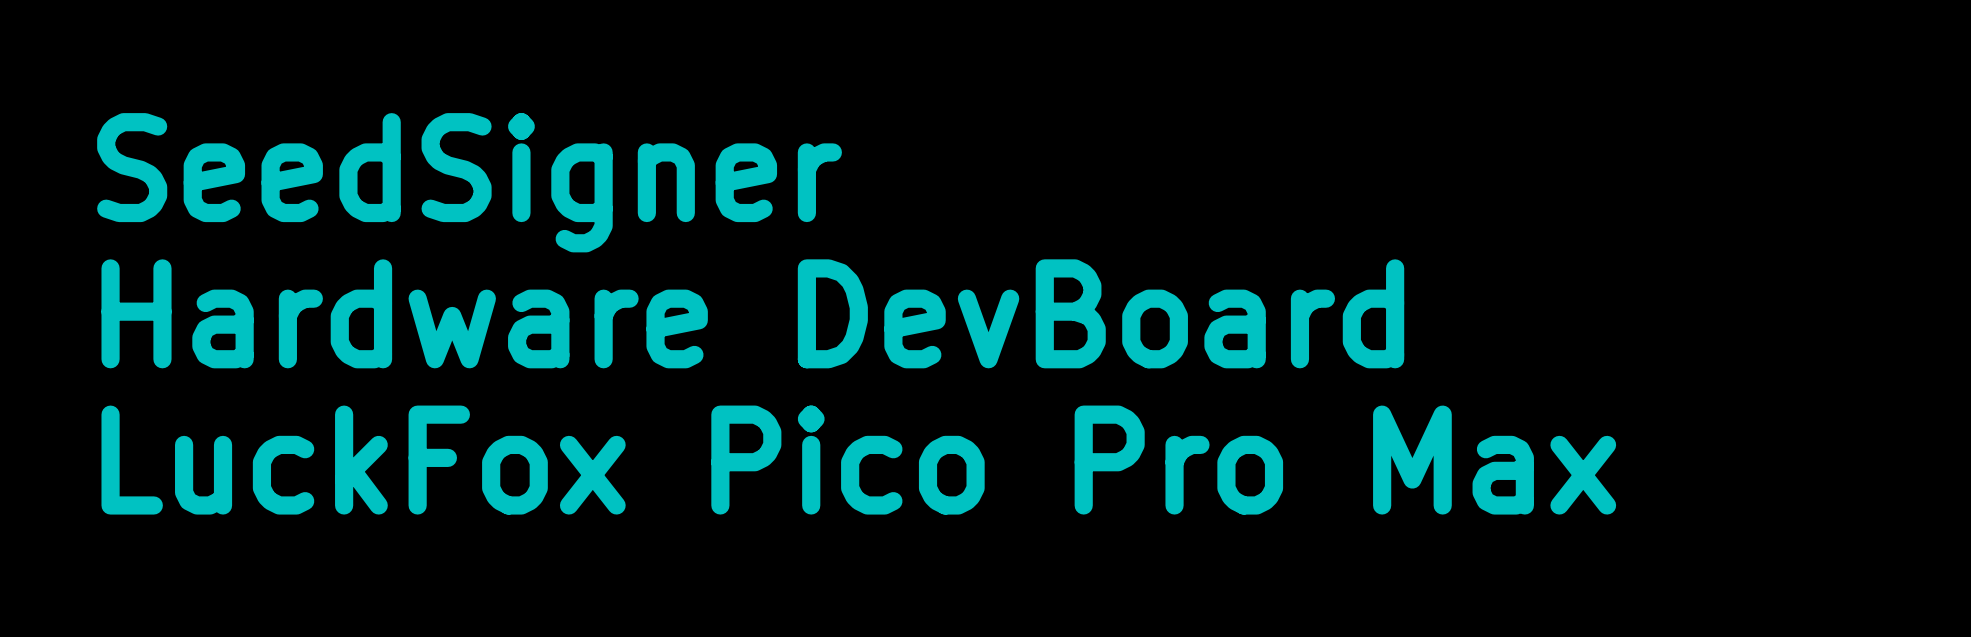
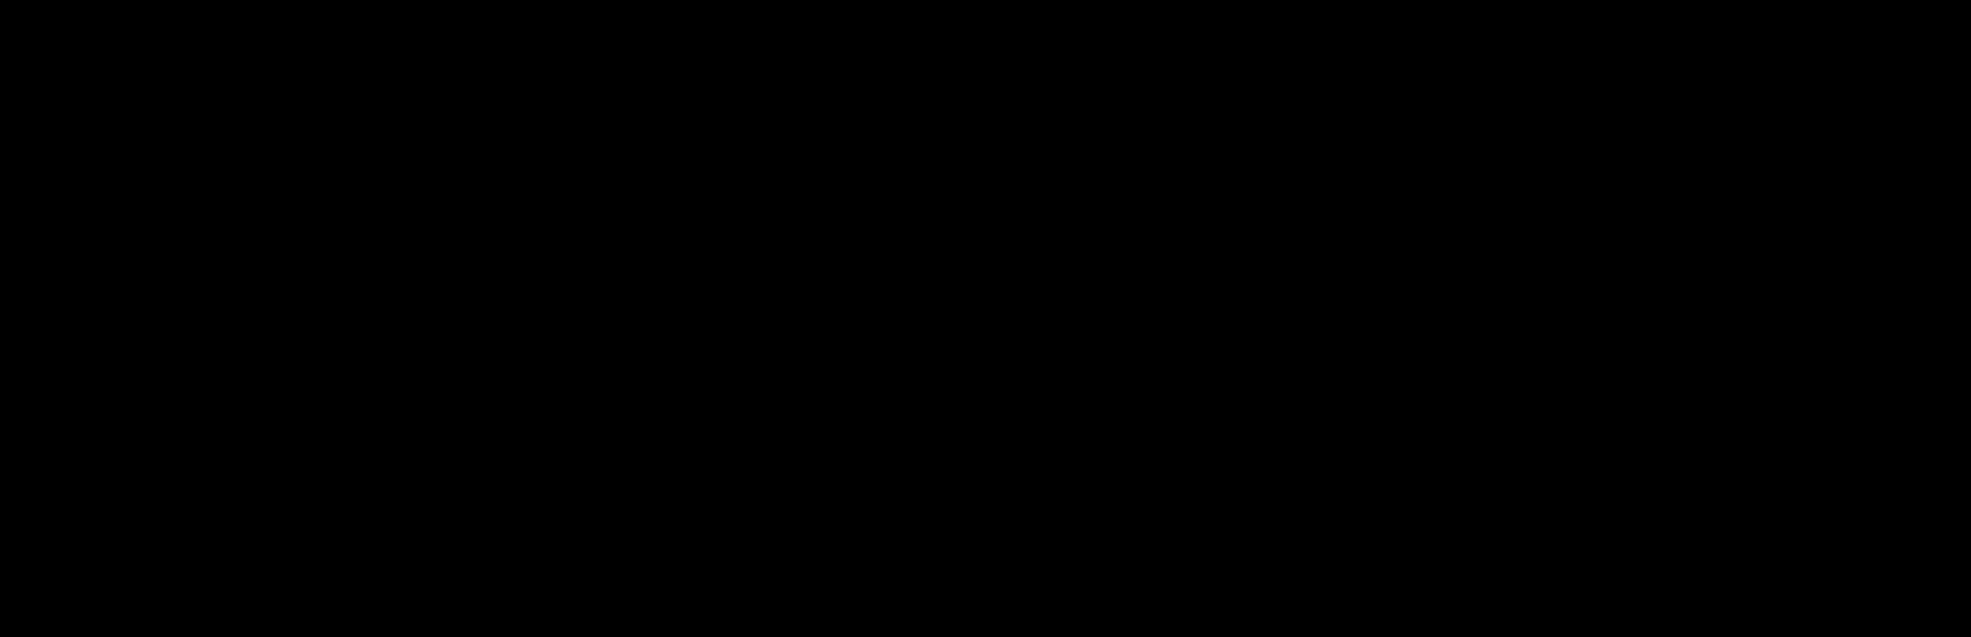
text: SeedSigner (469, 182) -> none
text: Hardware DevBoard (752, 313) -> none
text: LuckFox Pico Pro Max (858, 460) -> none

